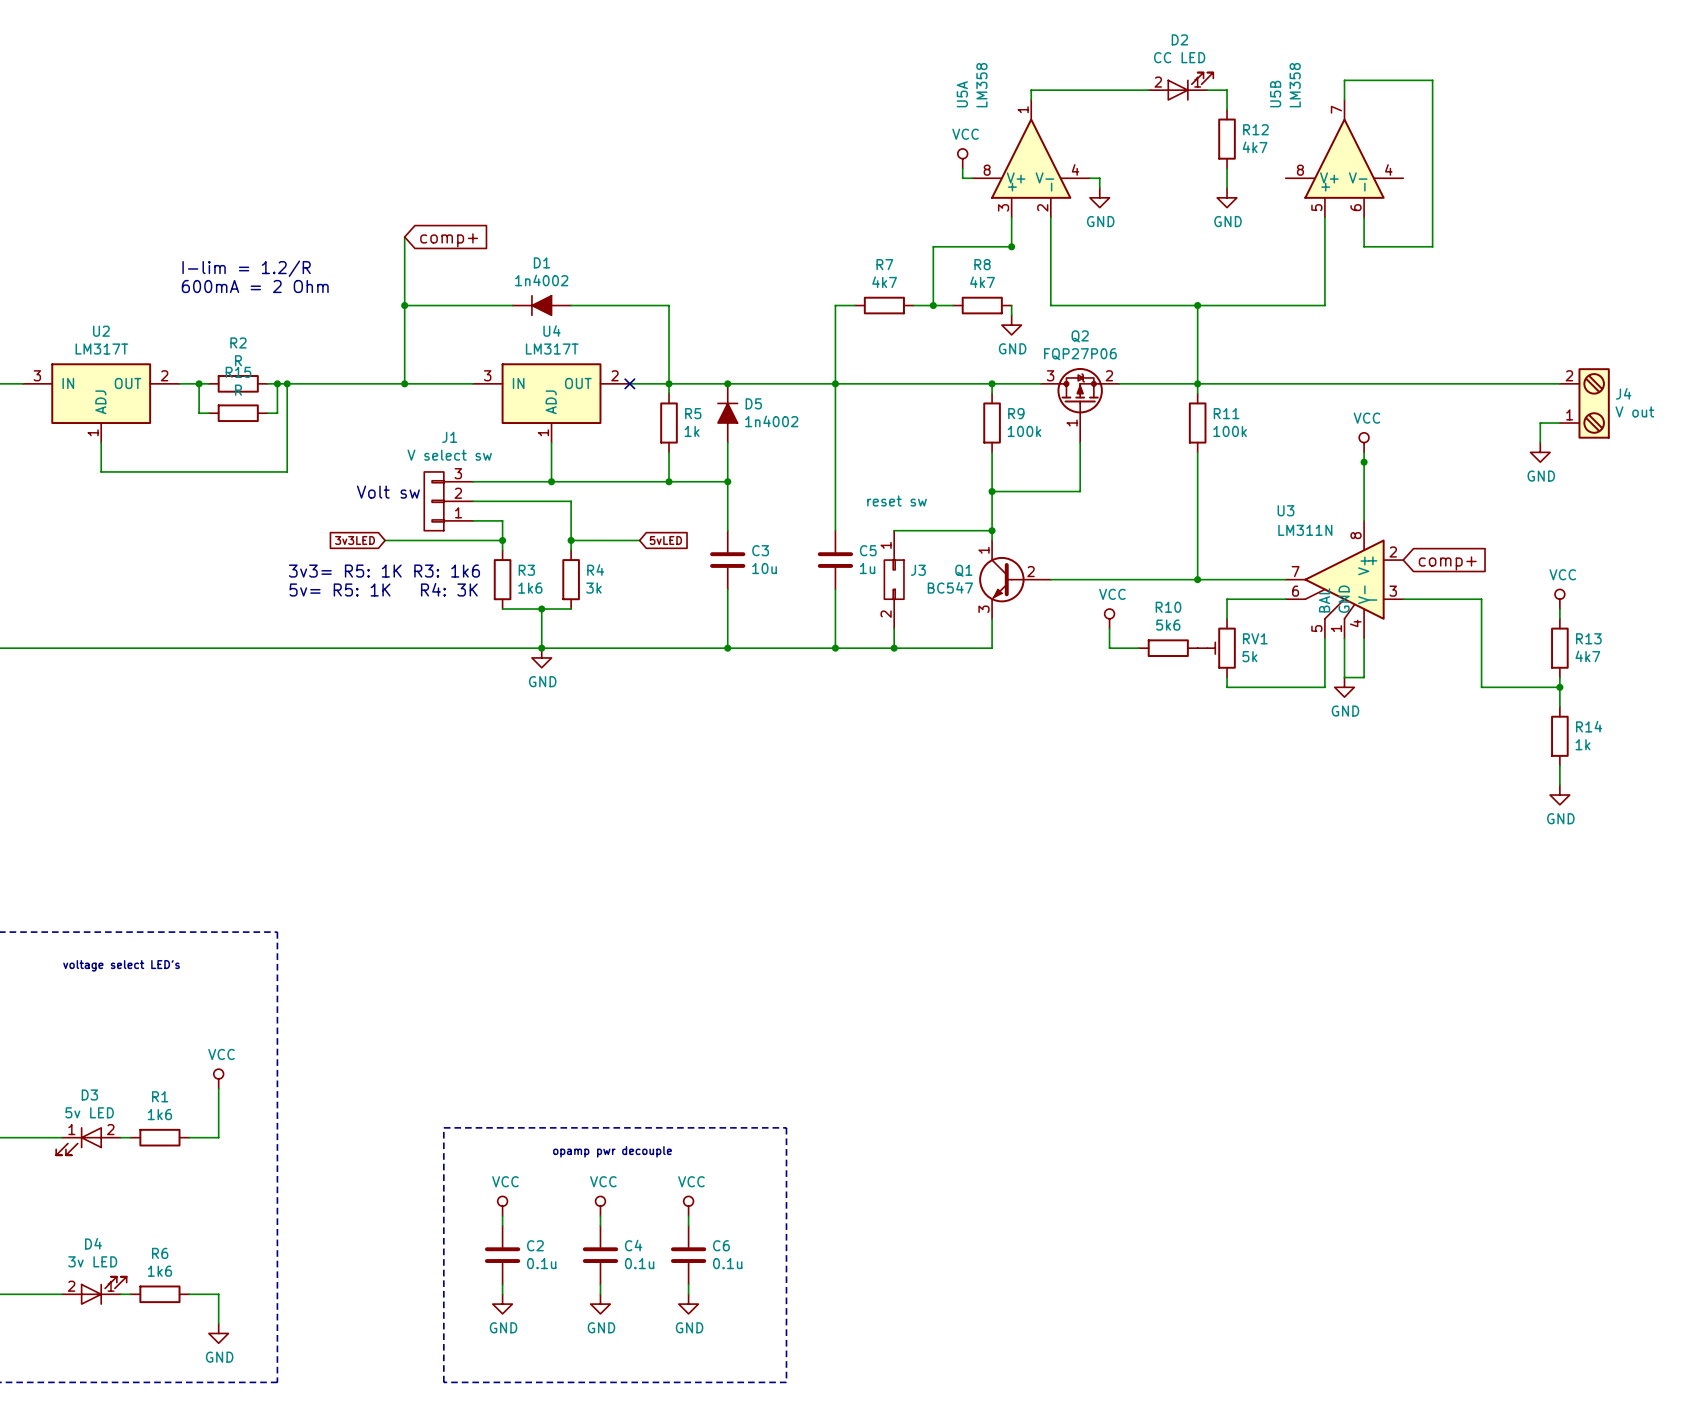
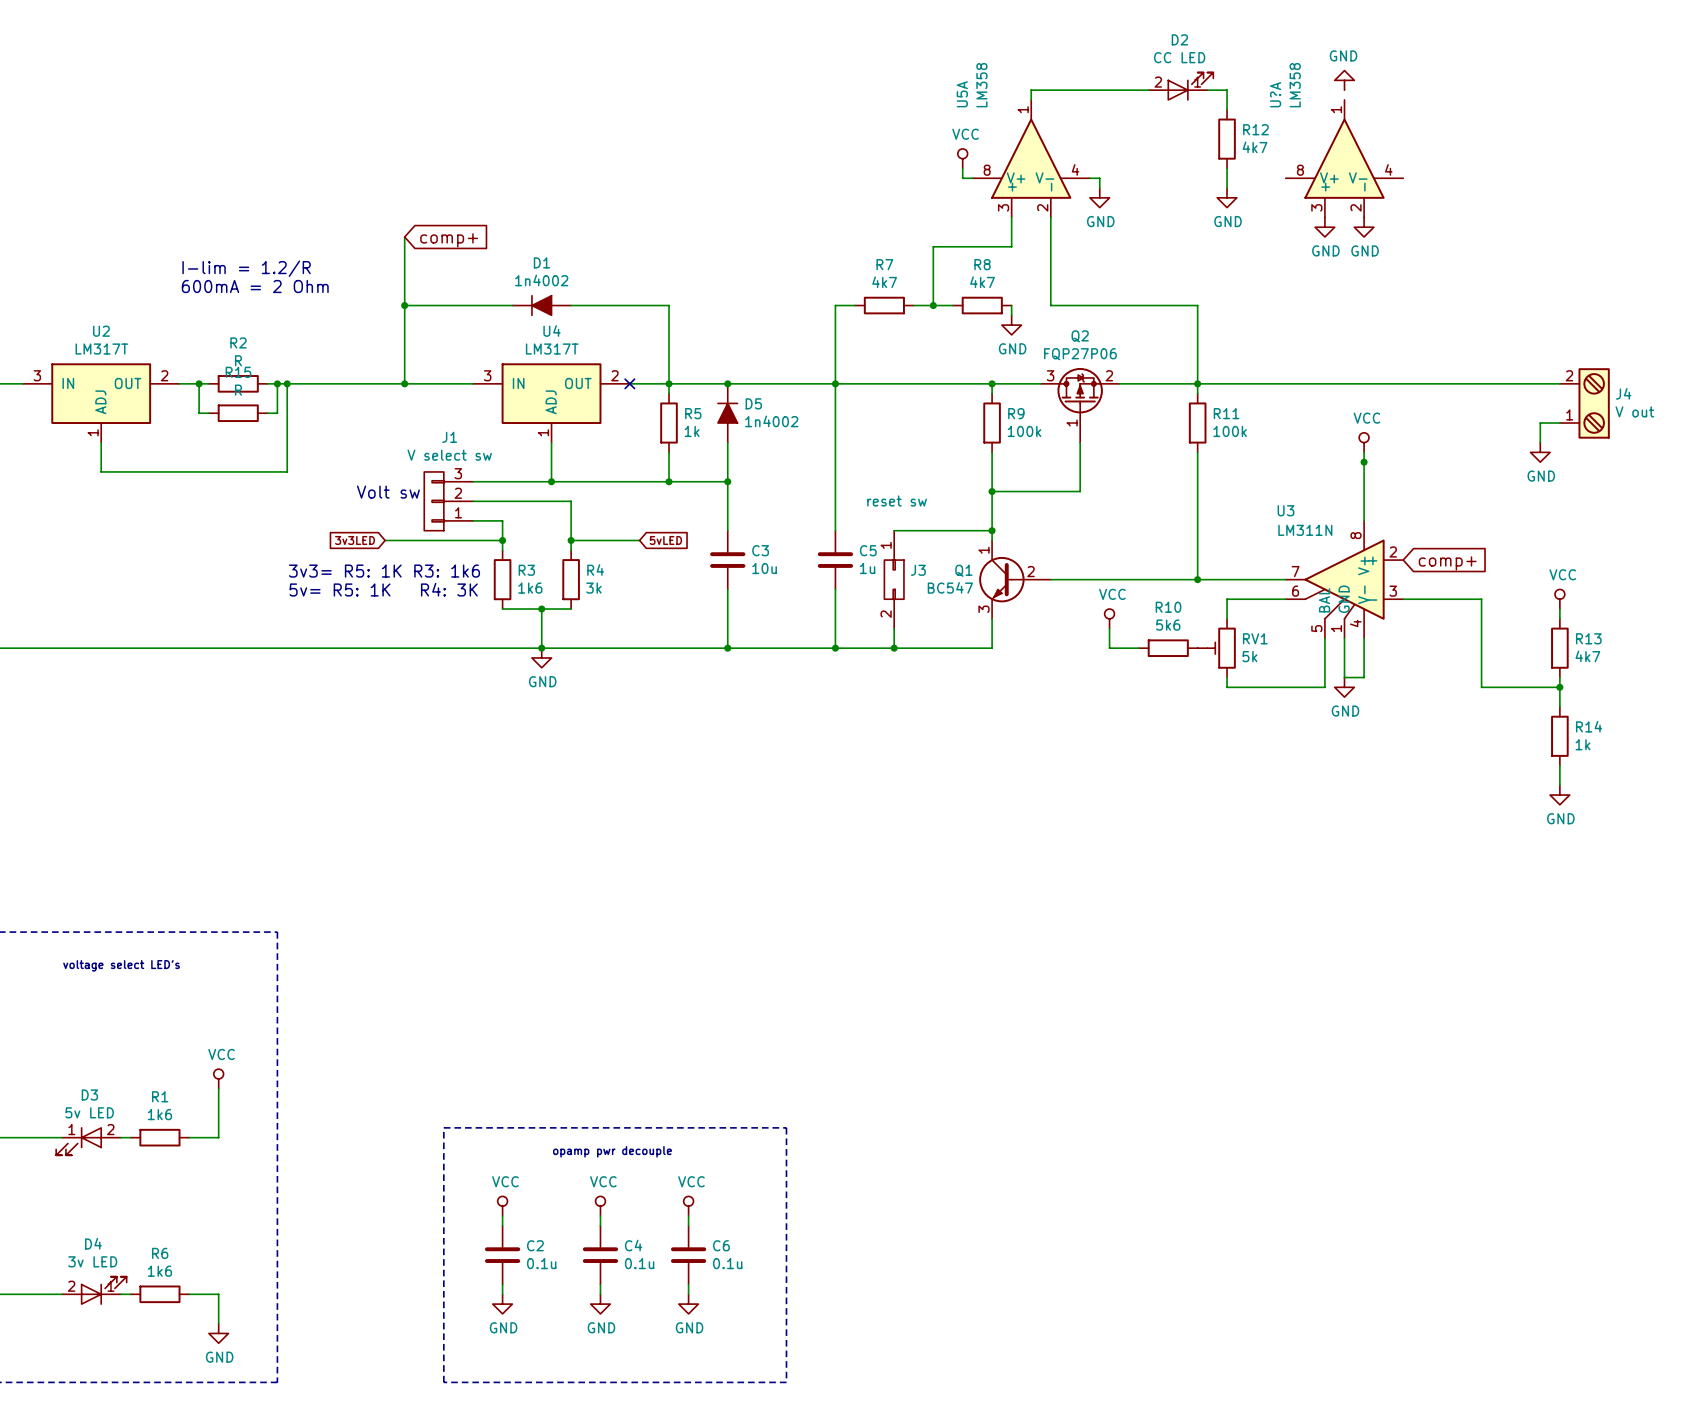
power symbol: none -> GND (1344, 80)
U5B name: U5B (1275, 94) -> U?A (1275, 94)
wire: (1344, 99) (1344, 80) (1432, 80) (1432, 246) (1364, 246) (1364, 217) -> none
U5B pin number: 7 (1336, 109) -> 1 (1336, 109)
U5B pin number: 5 (1316, 207) -> 3 (1316, 207)
U5B pin number: 6 (1356, 207) -> 2 (1356, 207)
wire: (1324, 217) (1324, 305) (1197, 305) -> none
power symbol: none -> GND (1324, 227)
power symbol: none -> GND (1364, 227)
junction: (1011, 246) -> none
junction: (1197, 305) -> none

